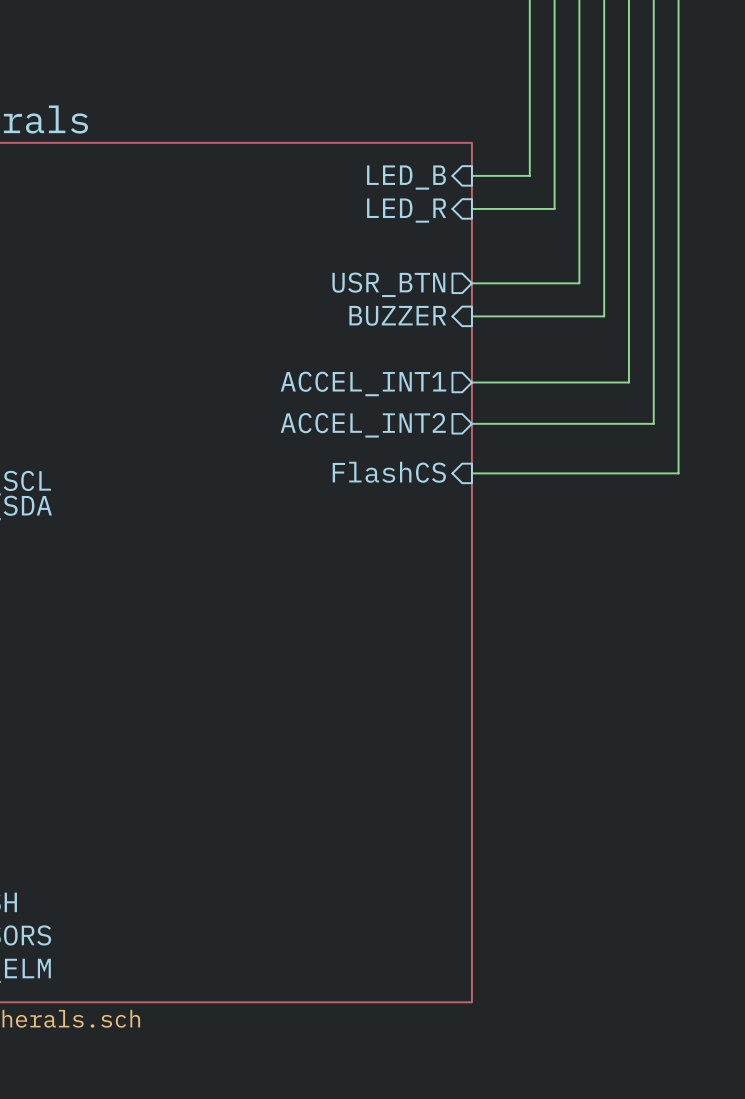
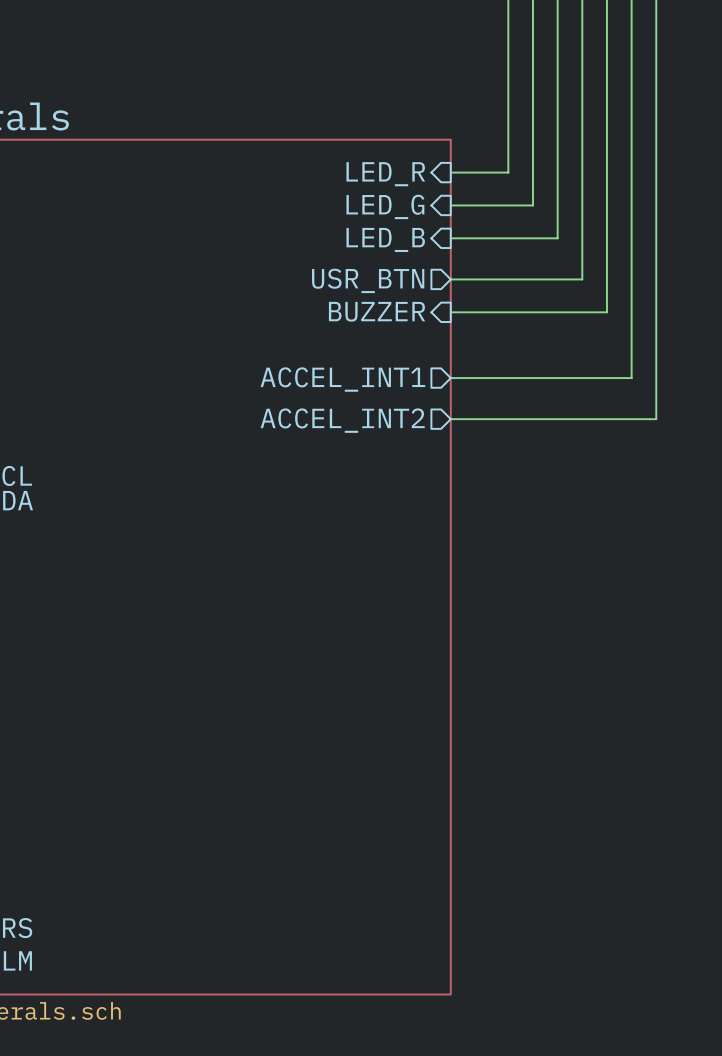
sheet pin: LED_B (406, 177) -> LED_R (385, 174)
sheet pin: LED_R (406, 210) -> LED_G (385, 206)
wire: (579, 242) (579, 283) -> (557, 238) (450, 238)
sheet pin: none -> LED_B (385, 239)
wire: (604, 283) (604, 316) -> (582, 279) (557, 279)
wire: (628, 316) (628, 382) -> (606, 312) (582, 312)
wire: (653, 382) (653, 423) -> (631, 378) (606, 378)
wire: (678, 423) (678, 473) (471, 473) -> (656, 419) (631, 419)
sheet pin: FlashCS (389, 472) -> none

